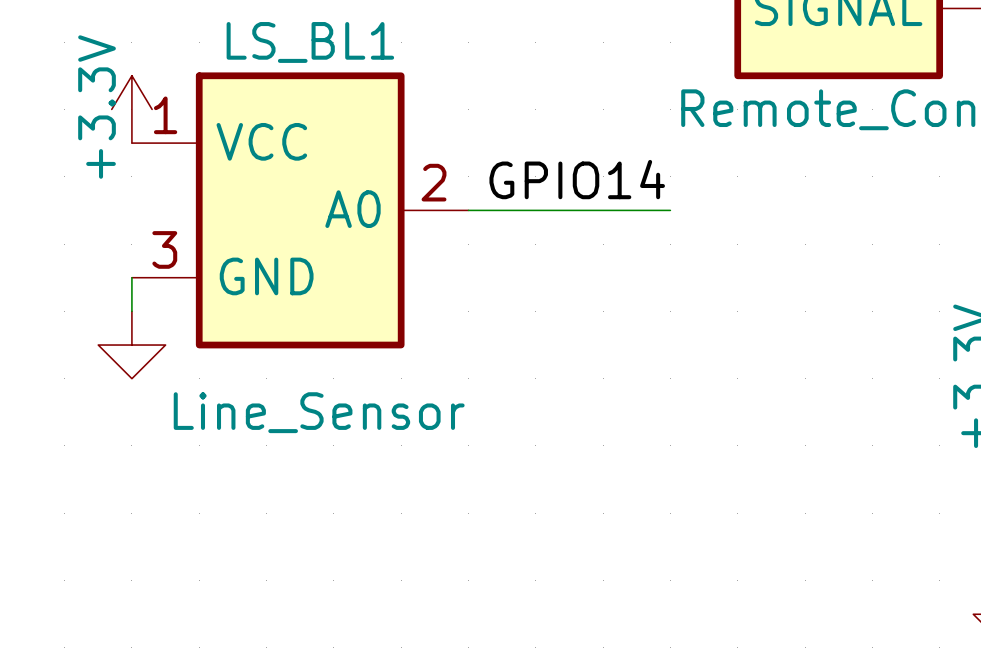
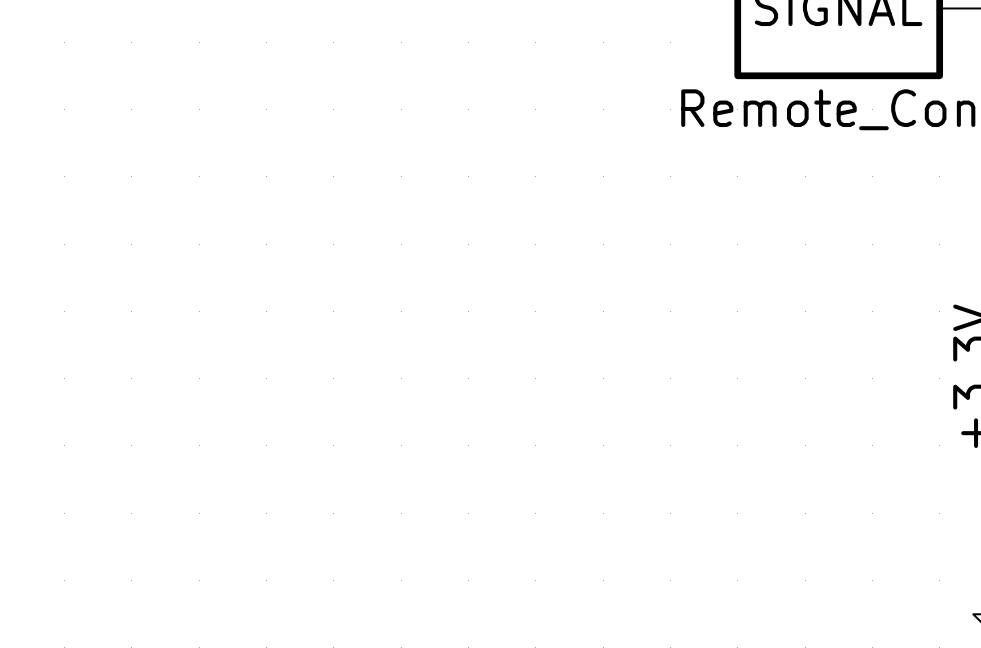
power symbol: +3.3V (131, 109) -> none
label: GPIO14 (577, 179) -> none
LS_BL1: Line_Sensor (300, 210) -> none
wire: (468, 210) (670, 210) -> none
wire: (131, 277) (131, 311) -> none
power symbol: (131, 345) -> none

